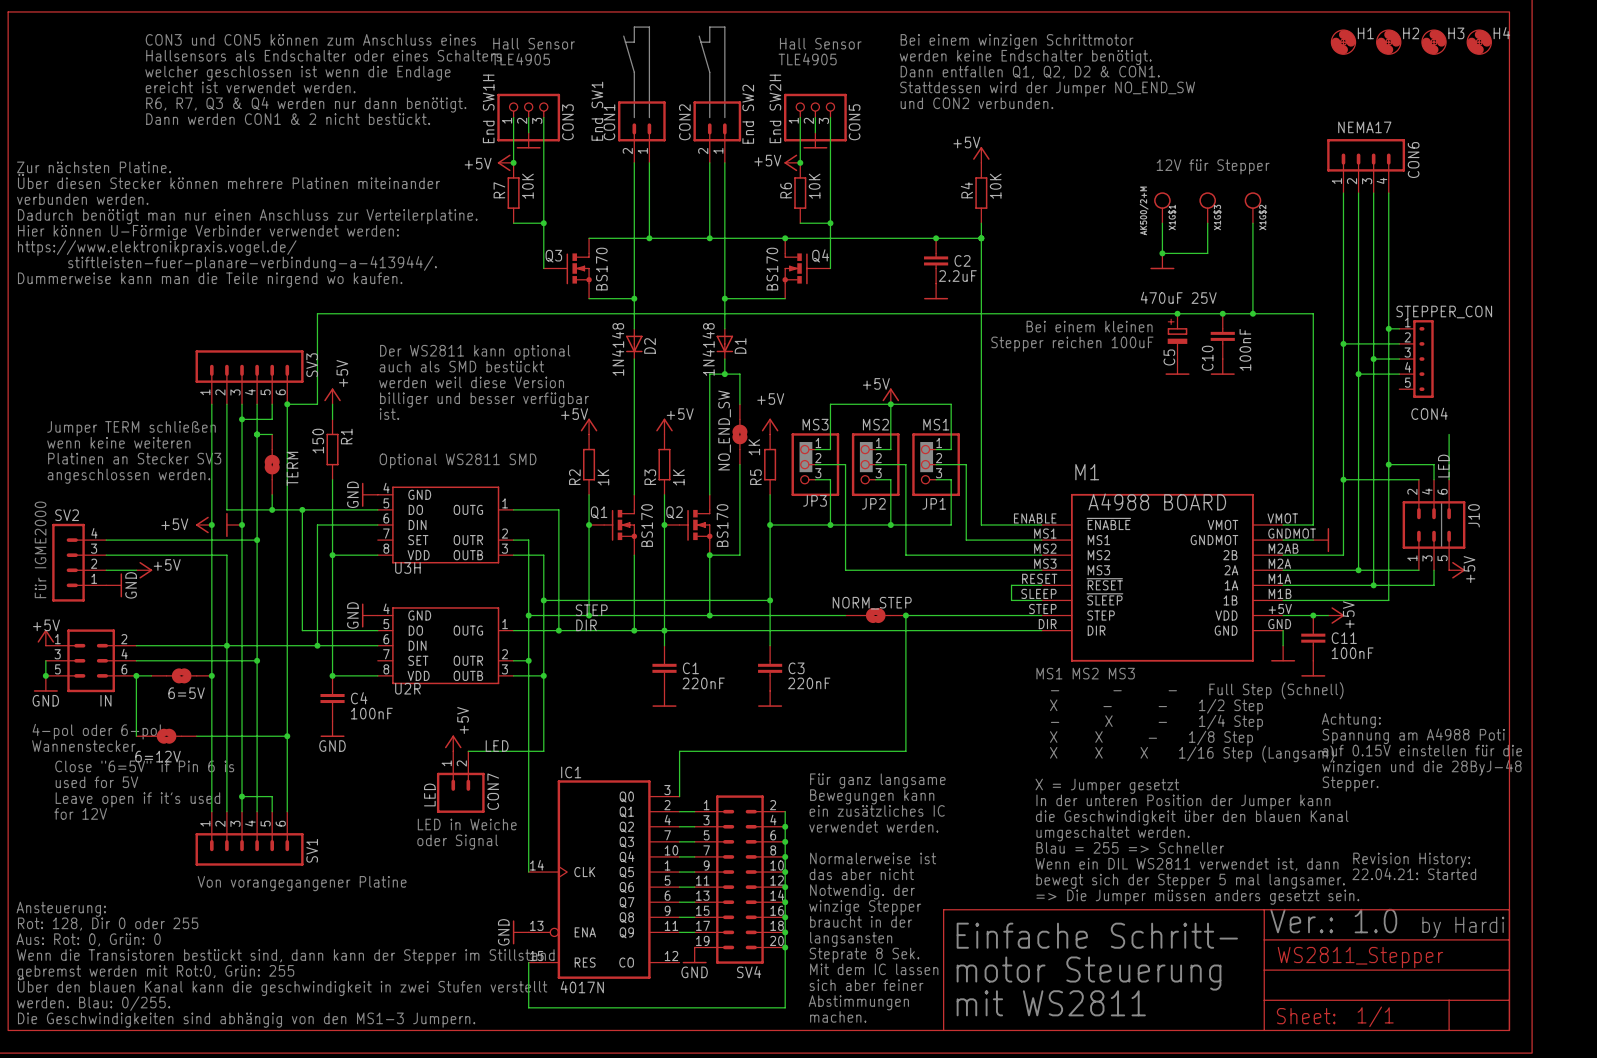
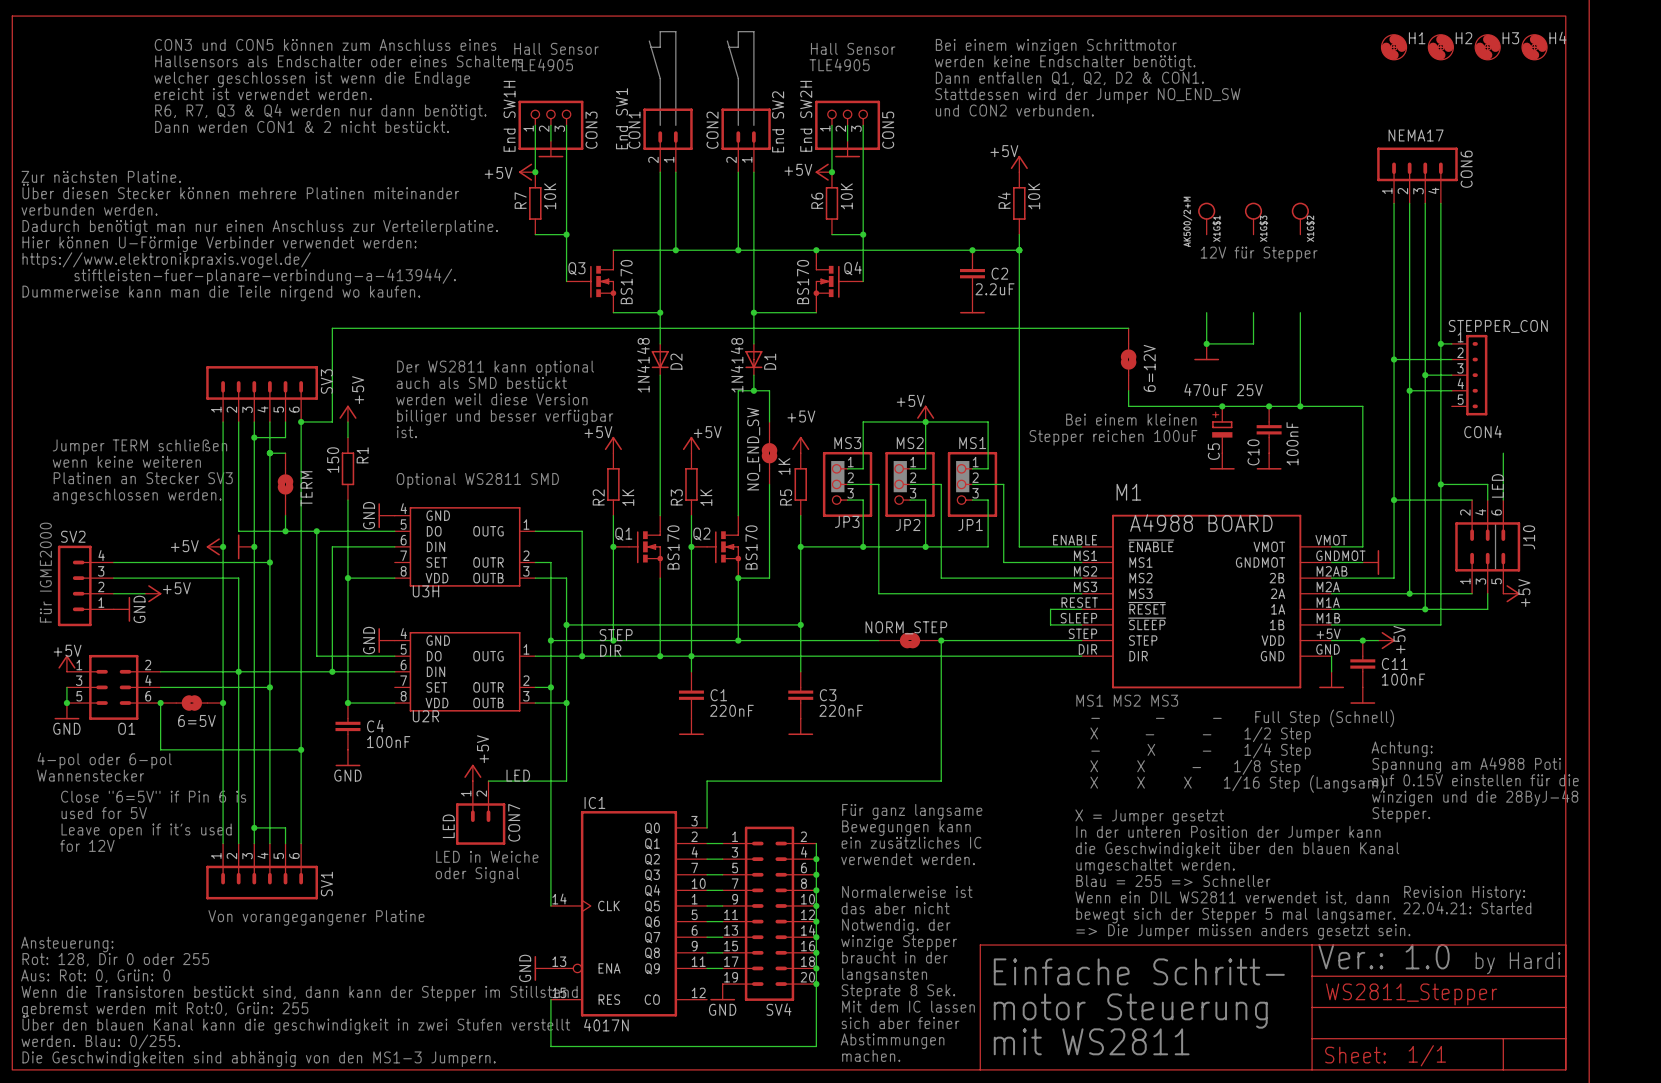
text position: 12V für Stepper (1213, 166) -> 12V für Stepper (1259, 254)
wire: (1162, 223) (1162, 253) (1207, 253) (1207, 223) -> (1206, 312) (1206, 343) (1253, 343) (1253, 312)
wire: (1252, 223) (1252, 298) -> (1300, 328) (1300, 406)
junction: (1162, 253) -> none
power symbol: (1162, 261) -> none
wire: (1086, 313) (1313, 313) (1313, 389) -> (1128, 390) (1128, 406) (1362, 406)
junction position: (1177, 313) -> (1206, 343)
junction: (1222, 313) -> none
junction: (1252, 313) -> none
text position: Bei einem kleinen (1089, 326) -> Bei einem kleinen (1131, 419)
power symbol: none -> (1206, 352)
C5 position: (1177, 336) -> (1222, 429)
C10 position: (1222, 336) -> (1269, 429)
text position: Stepper reichen 100uF (1072, 344) -> Stepper reichen 100uF (1113, 437)
power symbol: (1177, 366) -> none
power symbol: (1222, 366) -> none
junction: none -> (1222, 406)
junction: none -> (1269, 406)
junction: none -> (1300, 406)
power symbol: none -> (1222, 461)
power symbol: none -> (1269, 461)
power symbol position: +5V (45, 637) -> +5V (66, 663)
wire: (45, 660) (45, 675) -> (66, 687) (66, 703)
IN: (91, 660) -> none
O1: none -> (113, 687)
junction position: (45, 675) -> (66, 703)
junction position: (136, 675) -> (160, 703)
wire: (151, 675) (136, 675) (136, 736) -> (160, 703) (160, 749) (301, 749)
power symbol position: GND (45, 683) -> GND (66, 711)
6=12V rotation: 0° (166, 736) -> 90° clockwise (1128, 359)
6=12V position: (166, 736) -> (1128, 359)
wire: (196, 736) (287, 736) -> none
junction position: (287, 736) -> (301, 749)
6=12V name position: 6=12V (158, 756) -> 6=12V (1149, 368)

